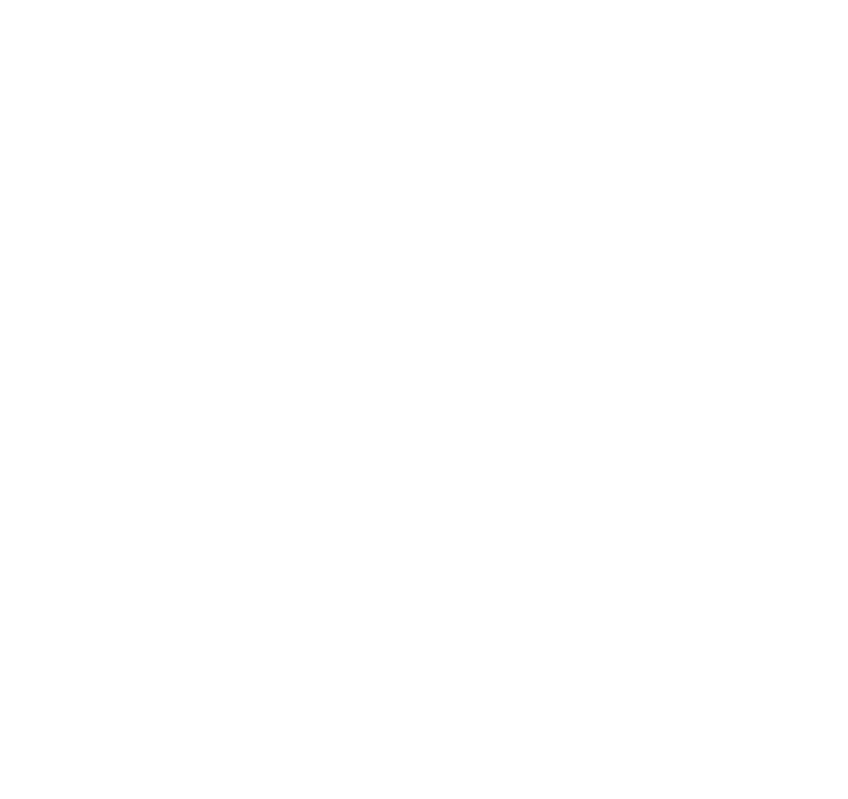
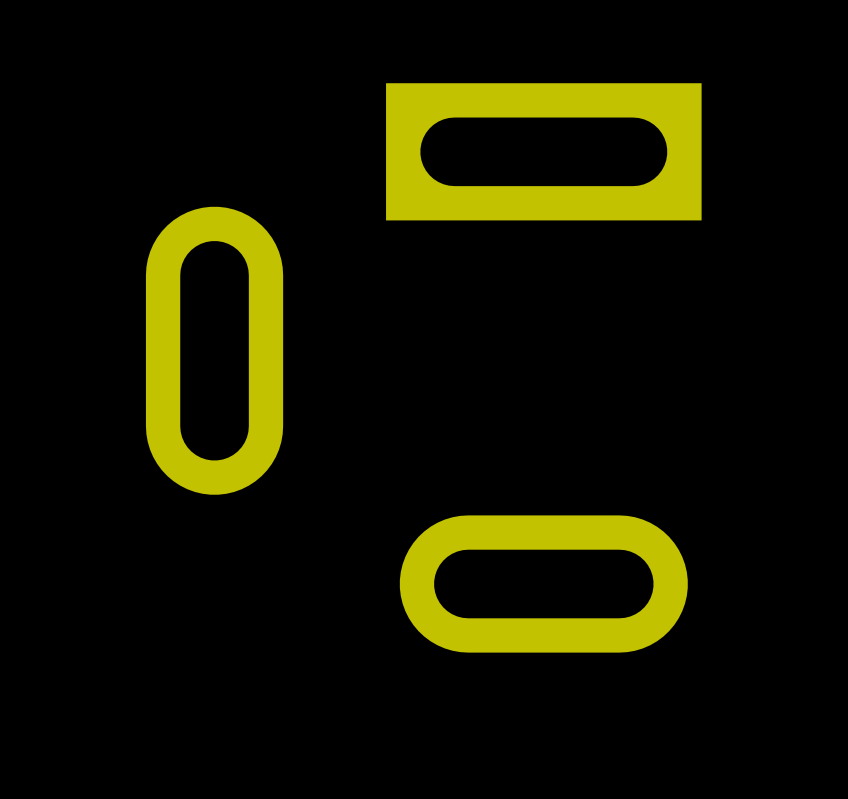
part: none -> (423, 367)

